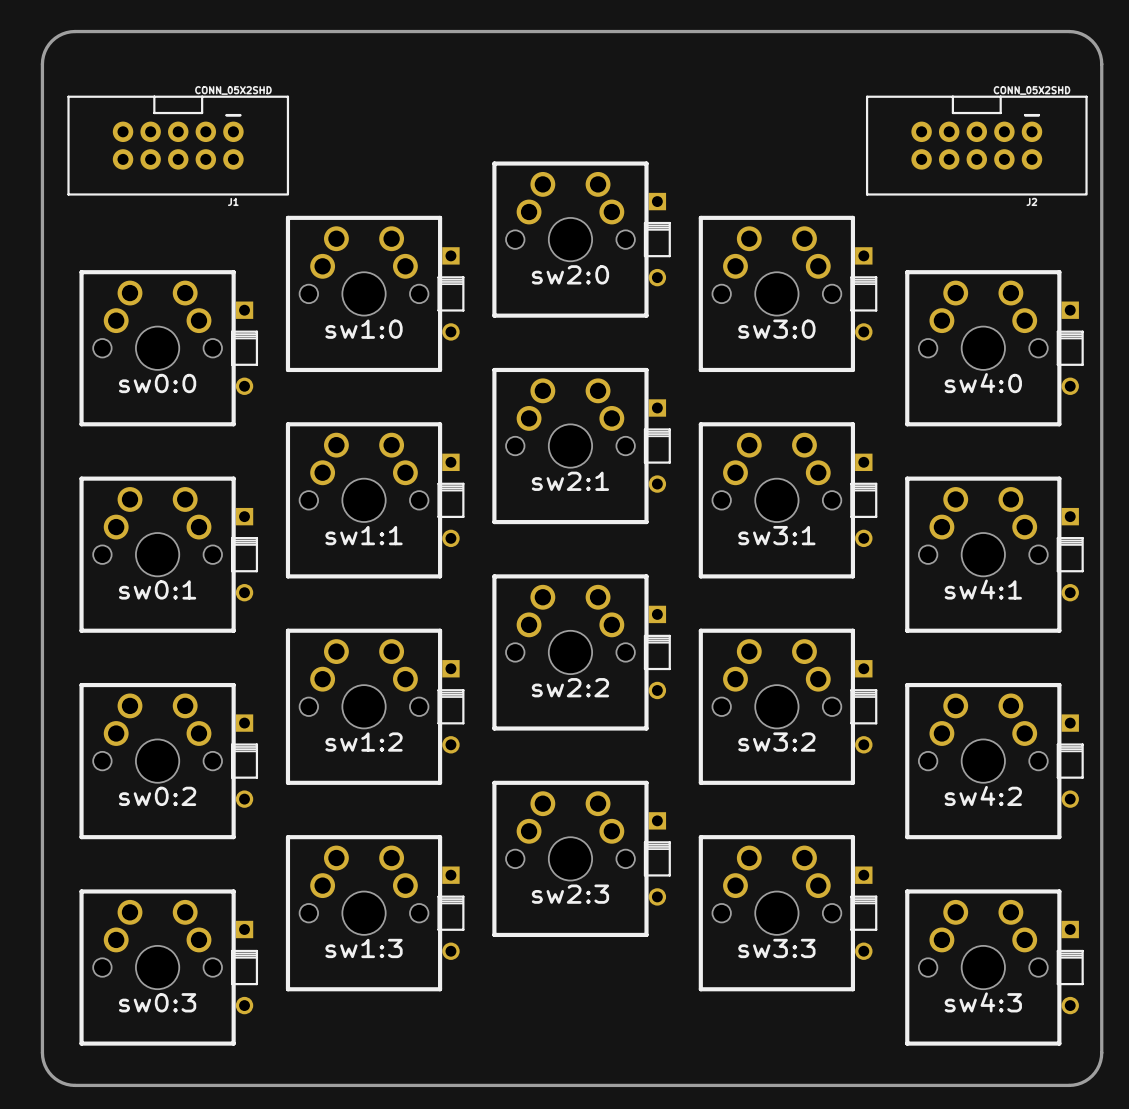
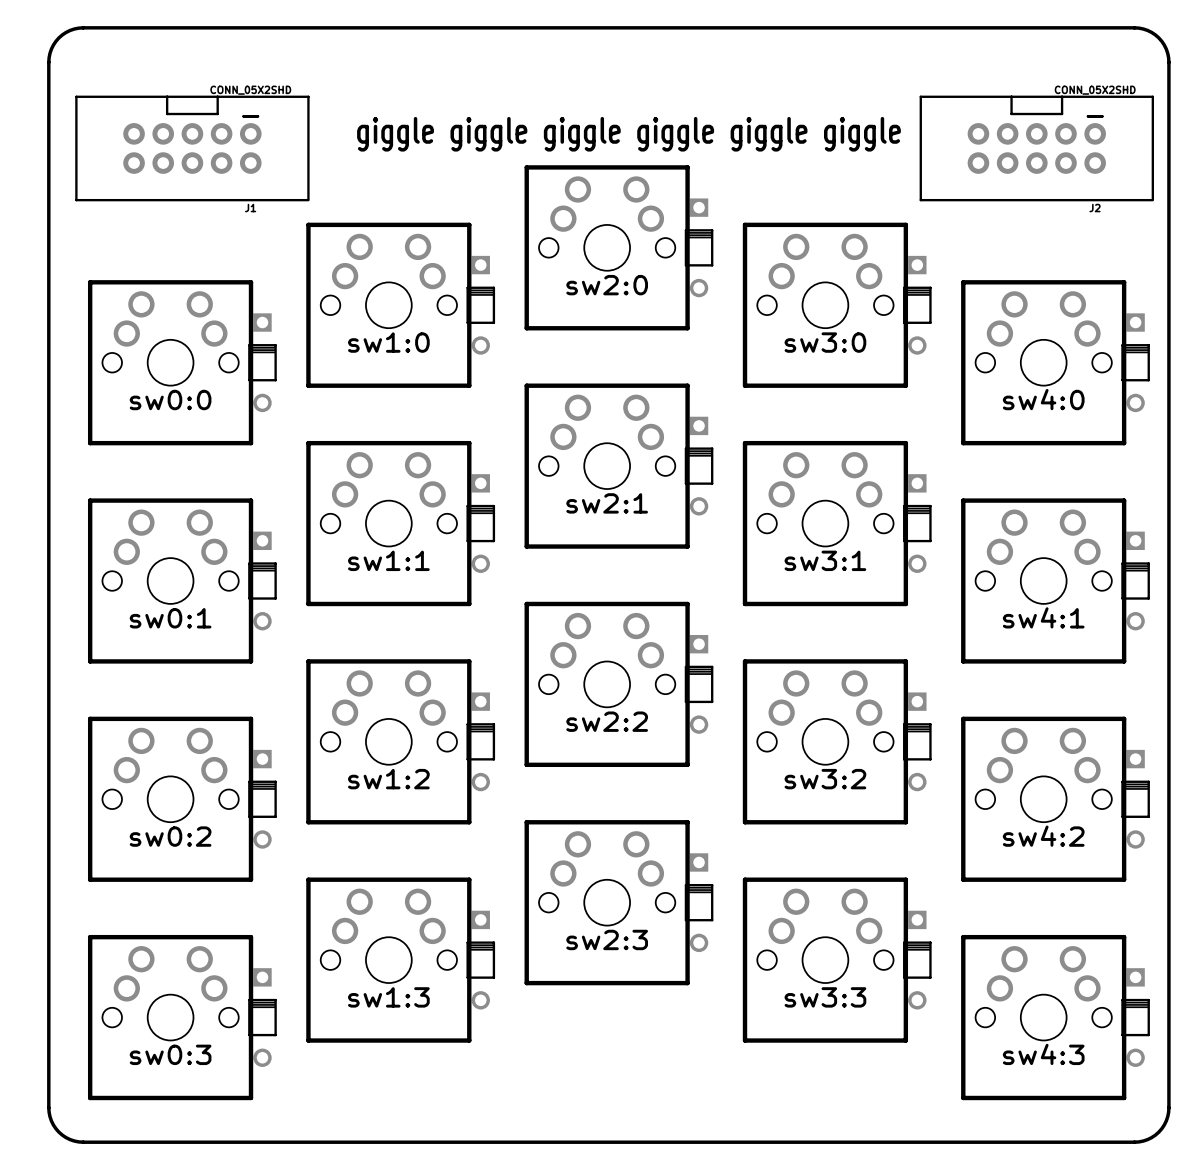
text: none -> giggle giggle giggle giggle giggle giggle (628, 134)

